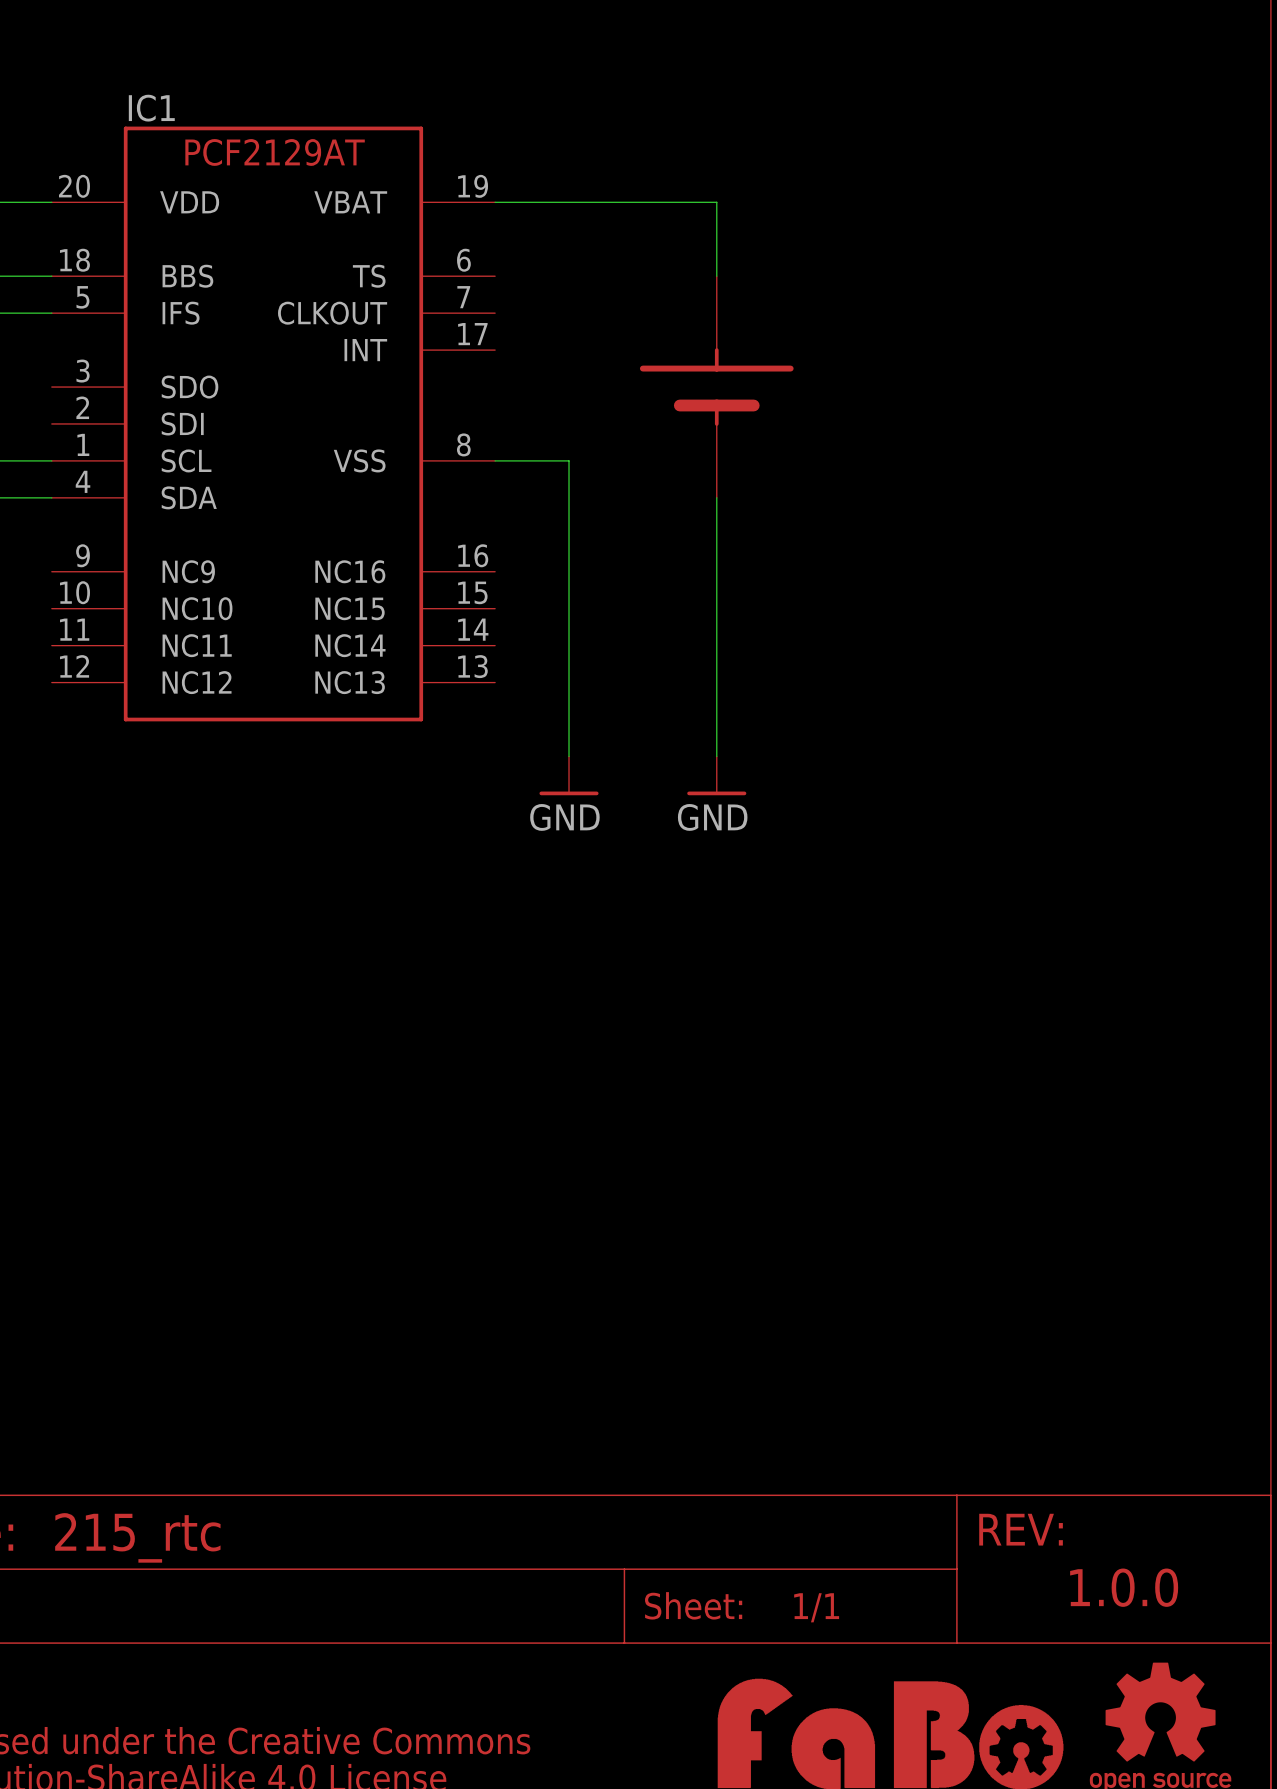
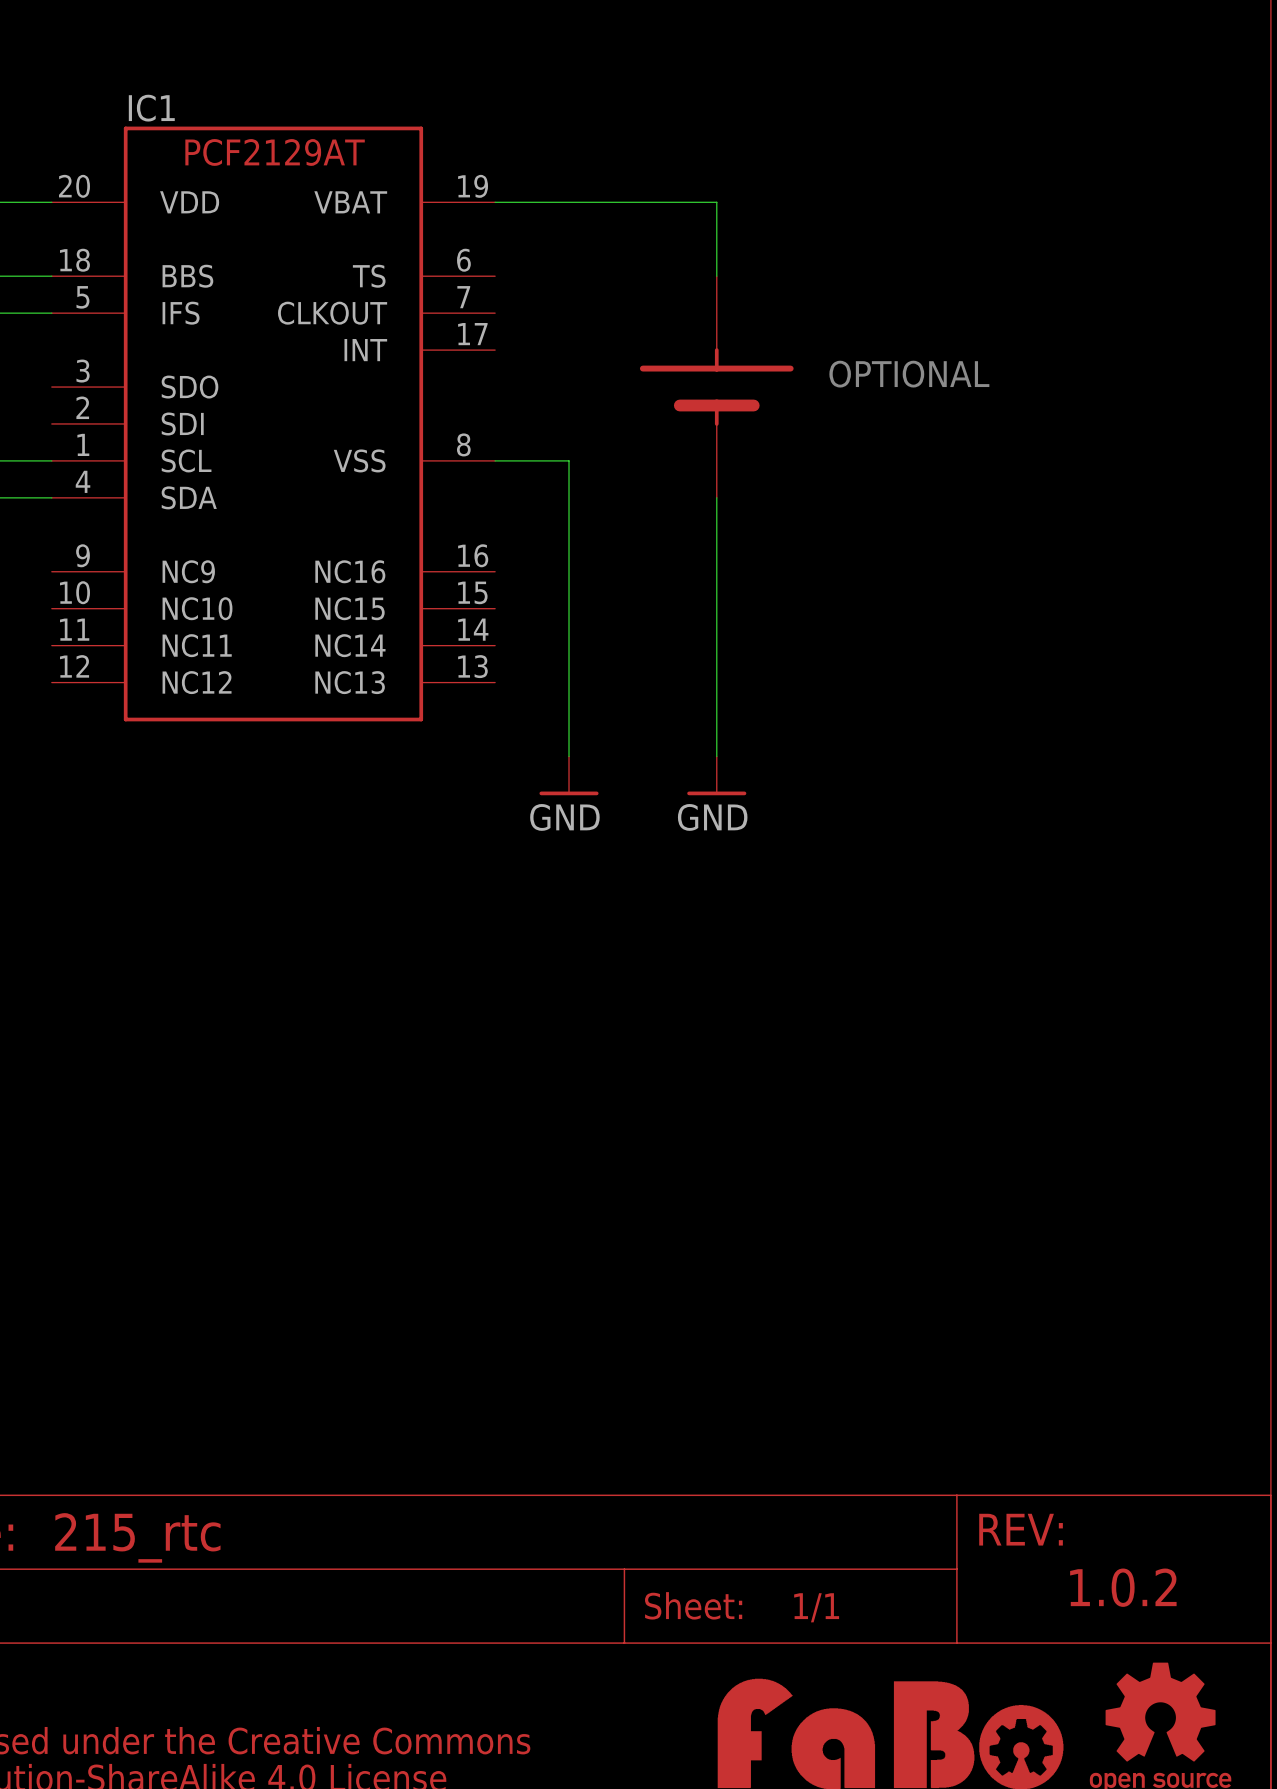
text: none -> OPTIONAL (909, 374)
text: 1.0.0 (1124, 1587) -> 1.0.2 (1123, 1587)

